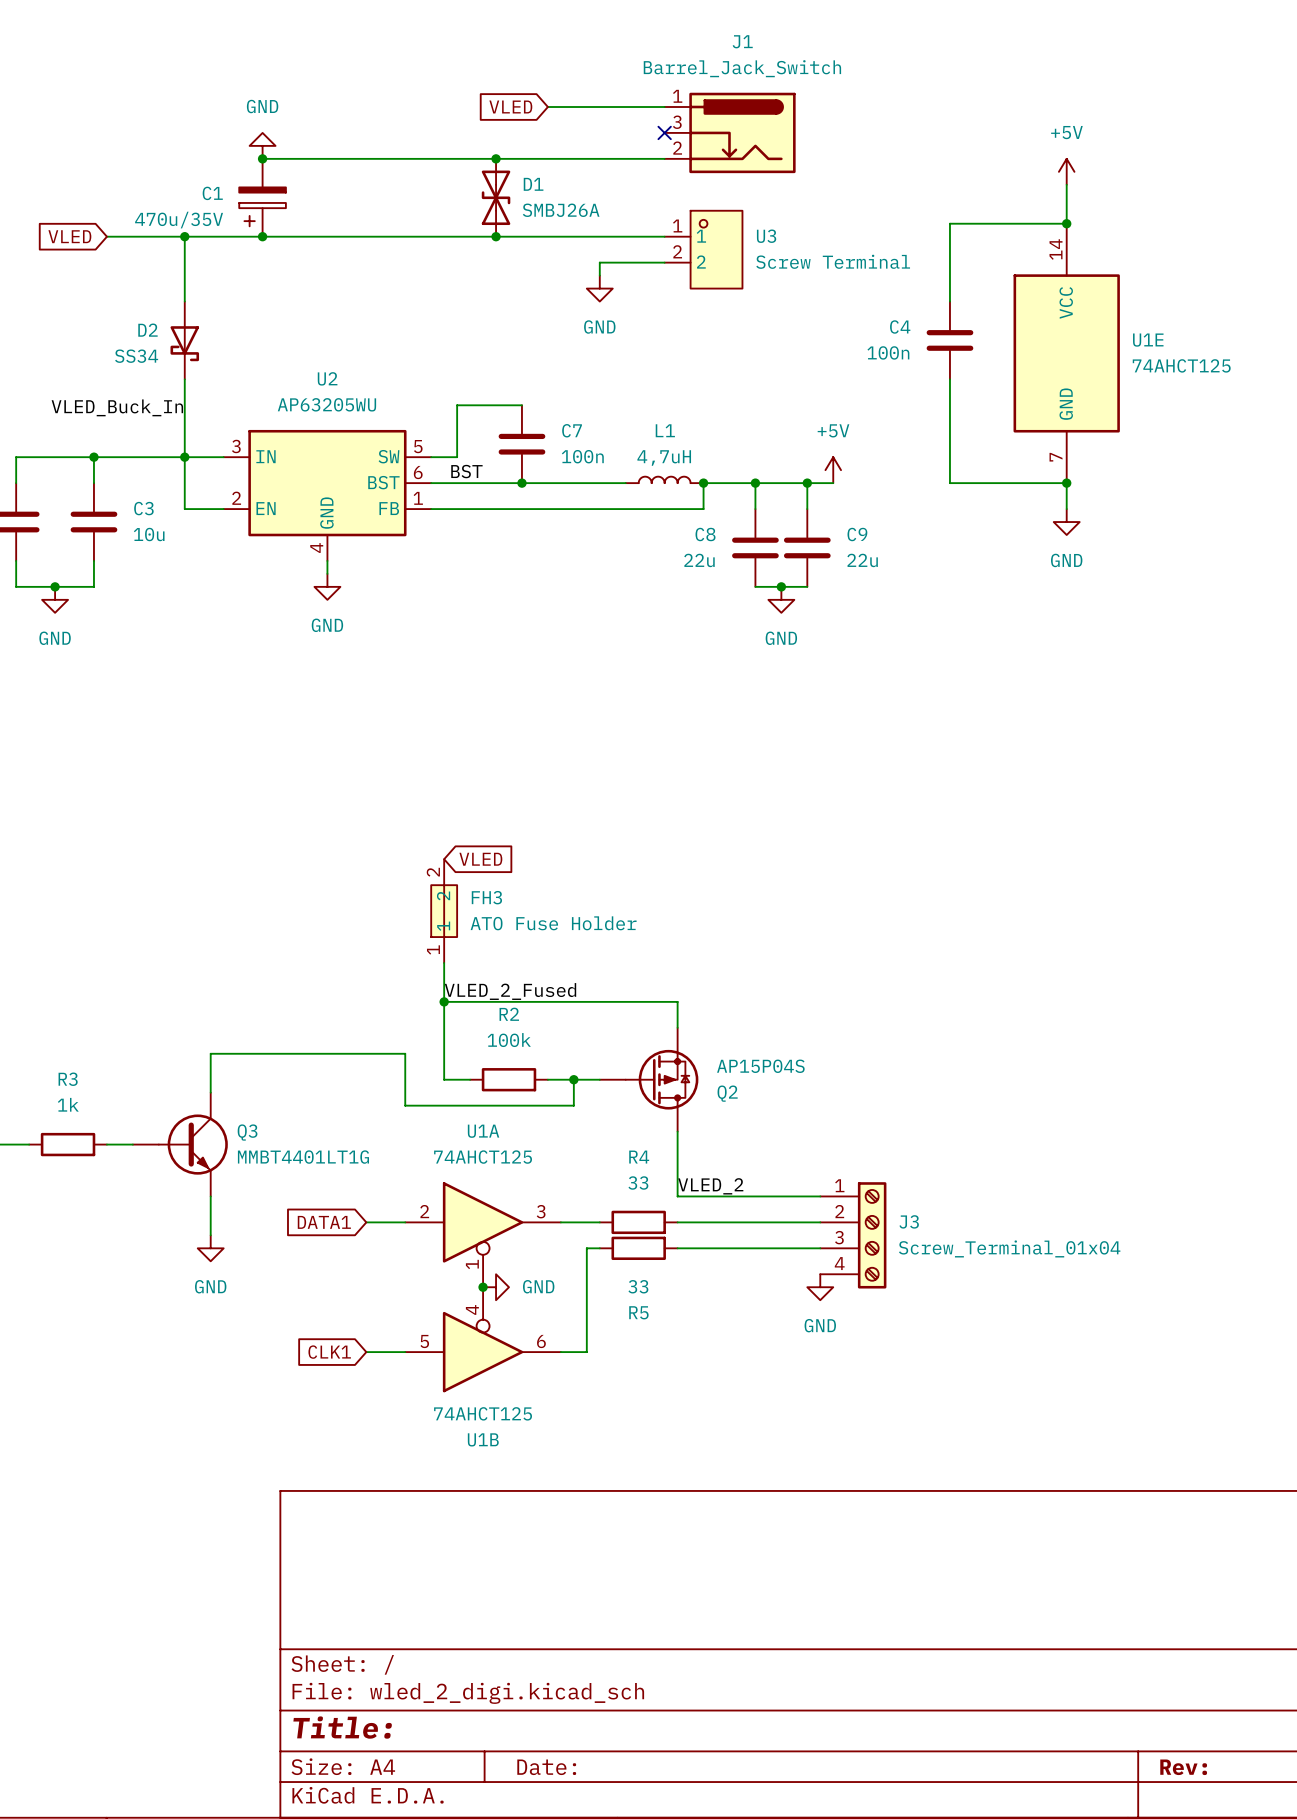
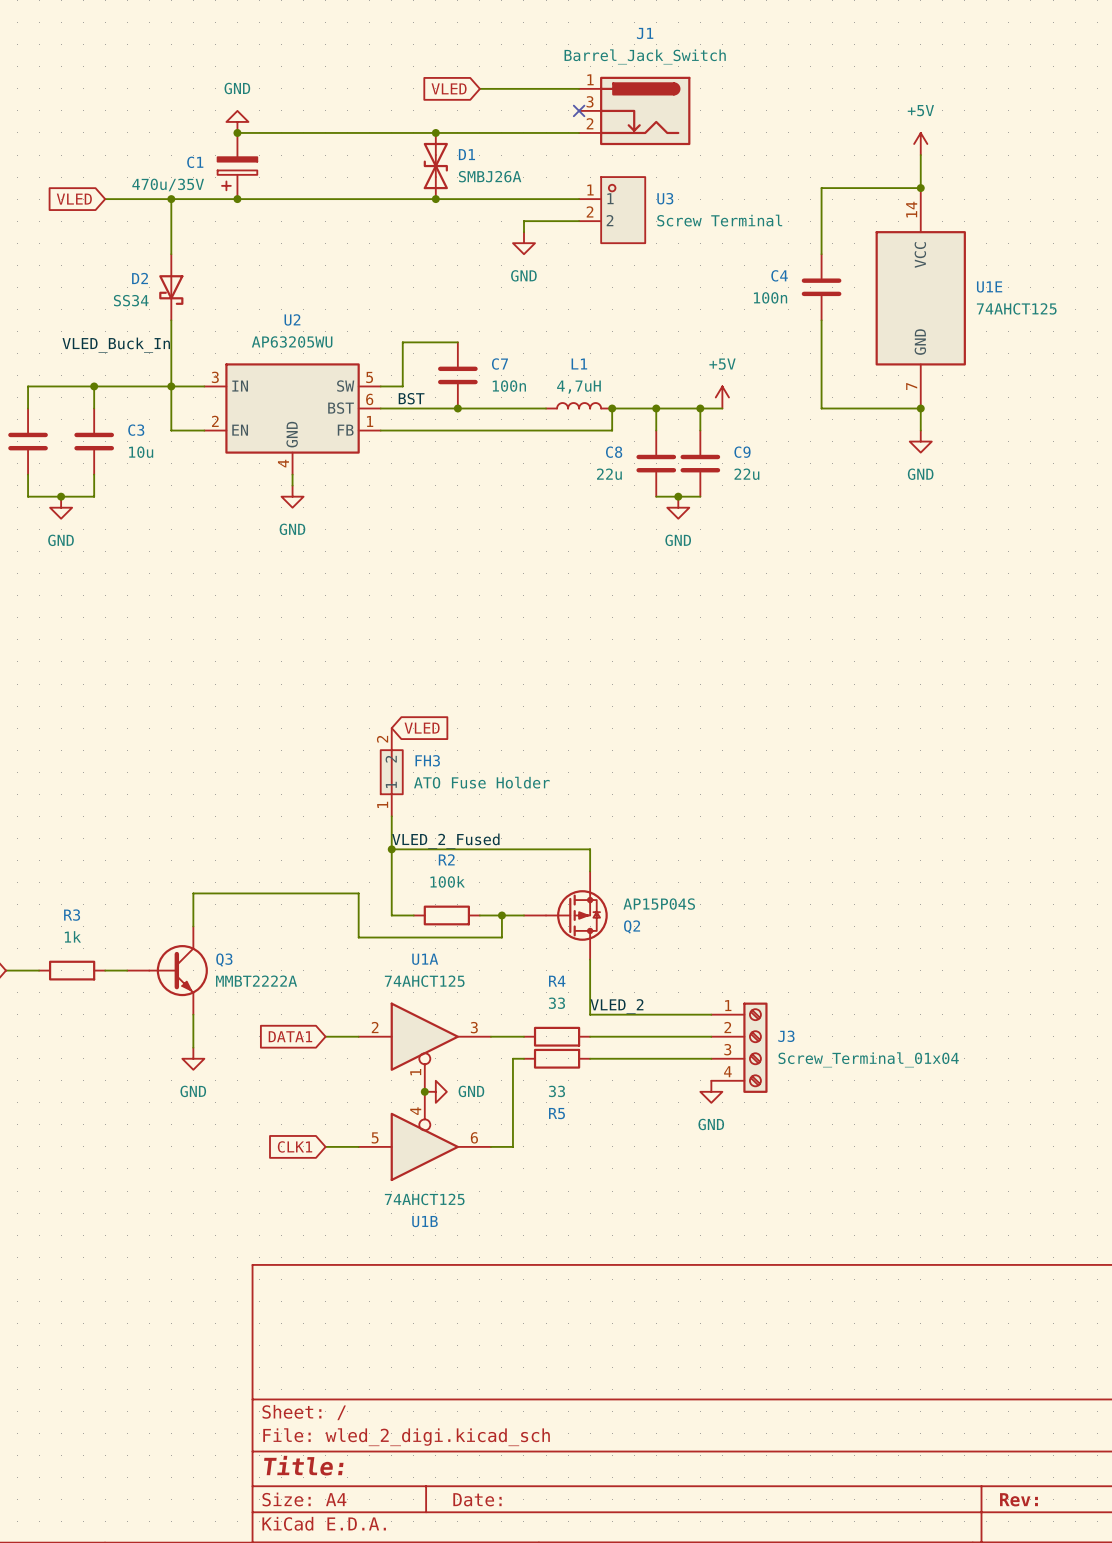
Q3 value: MMBT4401LT1G (303, 1157) -> MMBT2222A (256, 981)

